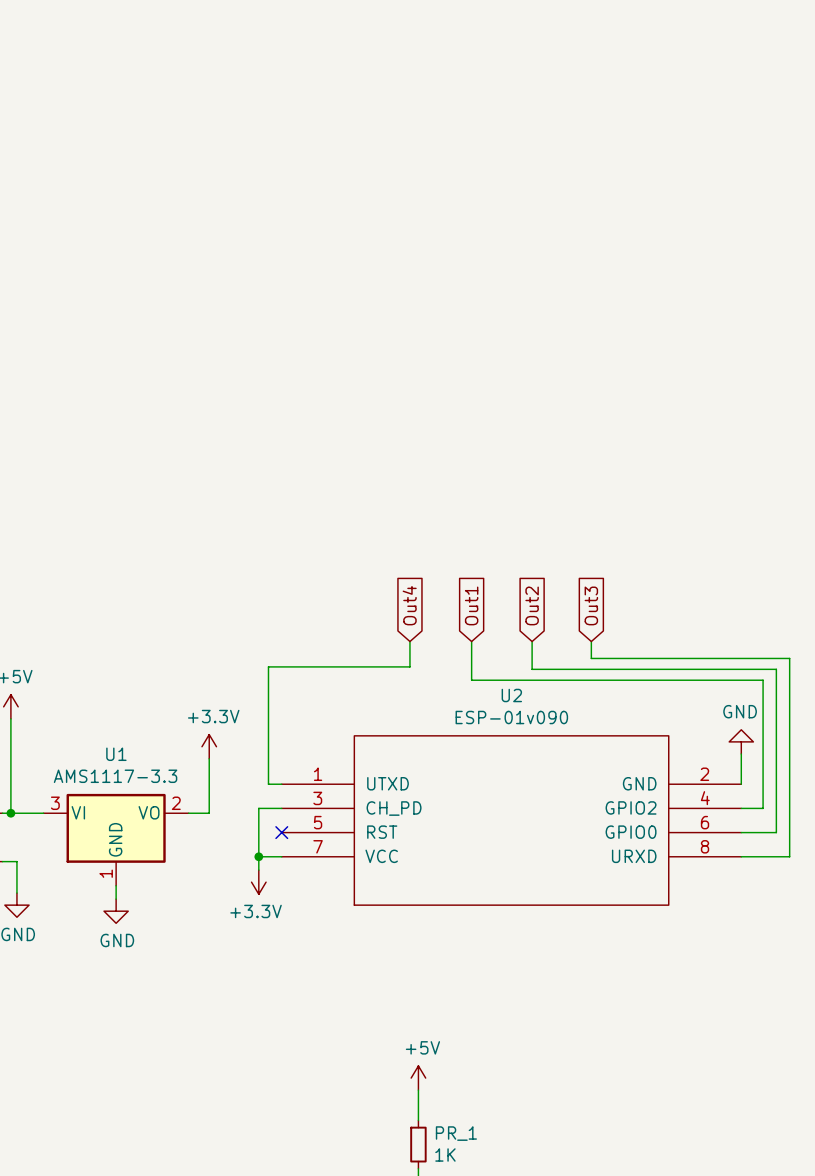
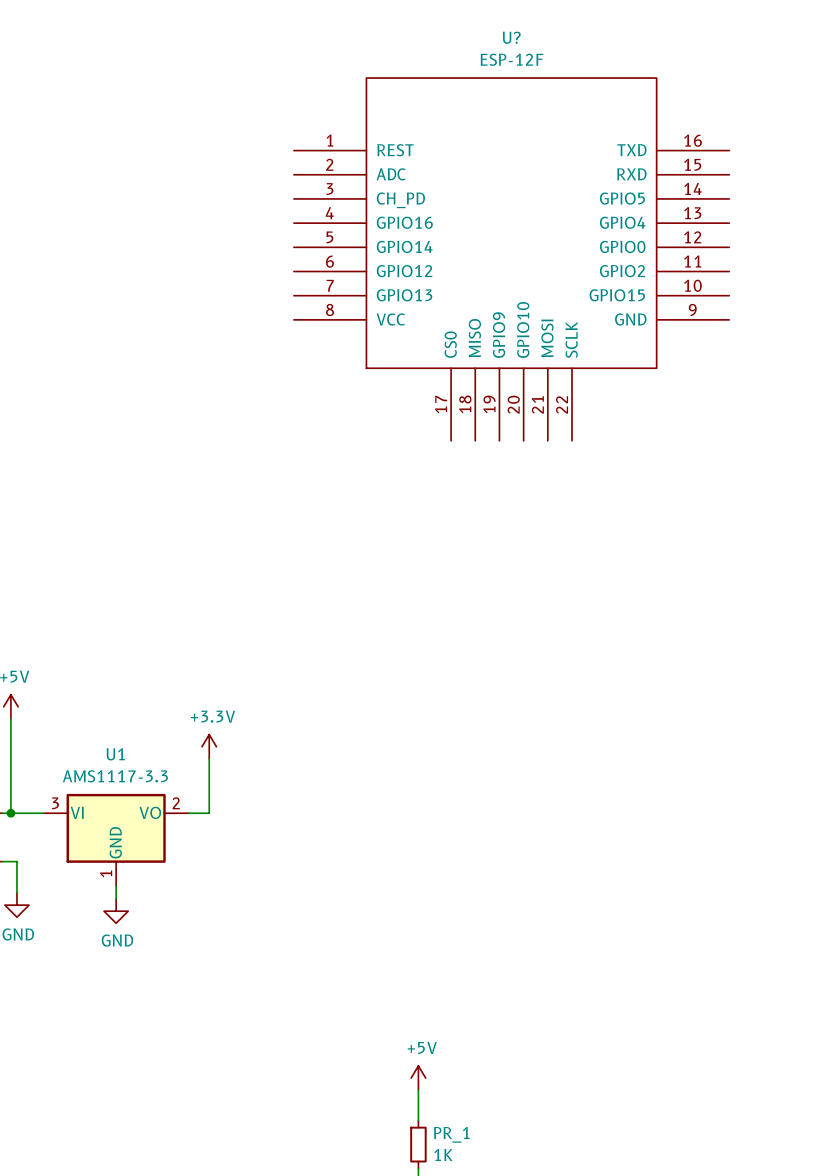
U?: none -> ESP-12F (511, 259)
global label: Out4 (409, 605) -> none
global label: Out1 (471, 605) -> none
global label: Out2 (532, 605) -> none
global label: Out3 (591, 605) -> none
wire: (409, 641) (409, 666) (268, 666) (268, 784) (281, 784) -> none
wire: (471, 641) (471, 680) (763, 680) (763, 808) (741, 808) -> none
wire: (532, 641) (532, 669) (776, 669) (776, 832) (741, 832) -> none
wire: (591, 641) (591, 658) (789, 658) (789, 856) (741, 856) -> none
power symbol: GND (741, 741) -> none
wire: (741, 753) (741, 784) -> none
wire: (281, 808) (258, 808) (258, 870) -> none
U2: ESP-01v090 (511, 820) -> none
no-connect mark: (281, 832) -> none
wire: (258, 856) (281, 856) -> none
junction: (258, 856) -> none
power symbol: +3.3V (258, 882) -> none

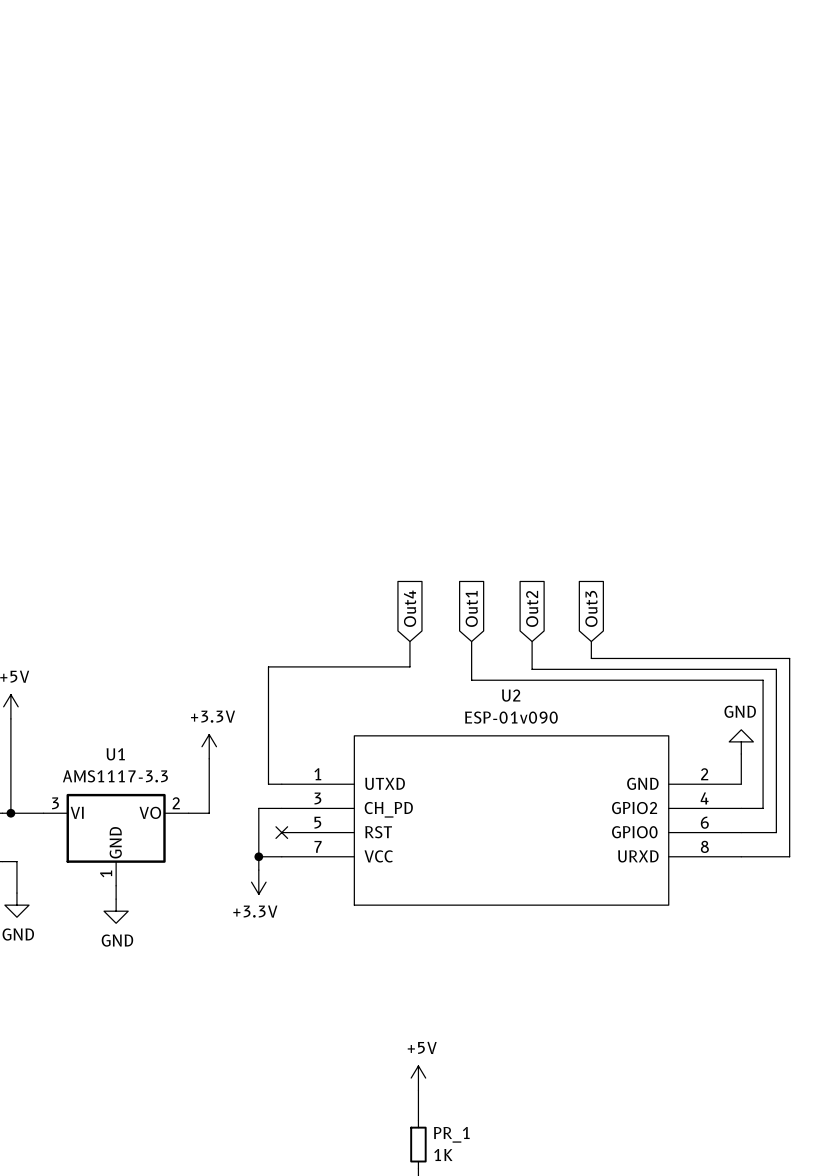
U?: ESP-12F (511, 259) -> none
global label: none -> Out4 (410, 608)
global label: none -> Out1 (471, 608)
global label: none -> Out2 (532, 608)
global label: none -> Out3 (591, 608)
wire: none -> (409, 641) (409, 666) (268, 666) (268, 784) (281, 784)
wire: none -> (471, 641) (471, 680) (763, 680) (763, 808) (741, 808)
wire: none -> (532, 641) (532, 669) (776, 669) (776, 832) (741, 832)
wire: none -> (591, 641) (591, 658) (789, 658) (789, 856) (741, 856)
power symbol: none -> GND (741, 741)
wire: none -> (741, 753) (741, 784)
wire: none -> (281, 808) (258, 808) (258, 870)
U2: none -> ESP-01v090 (511, 820)
no-connect mark: none -> (281, 832)
wire: none -> (258, 856) (281, 856)
junction: none -> (258, 856)
power symbol: none -> +3.3V (258, 882)

